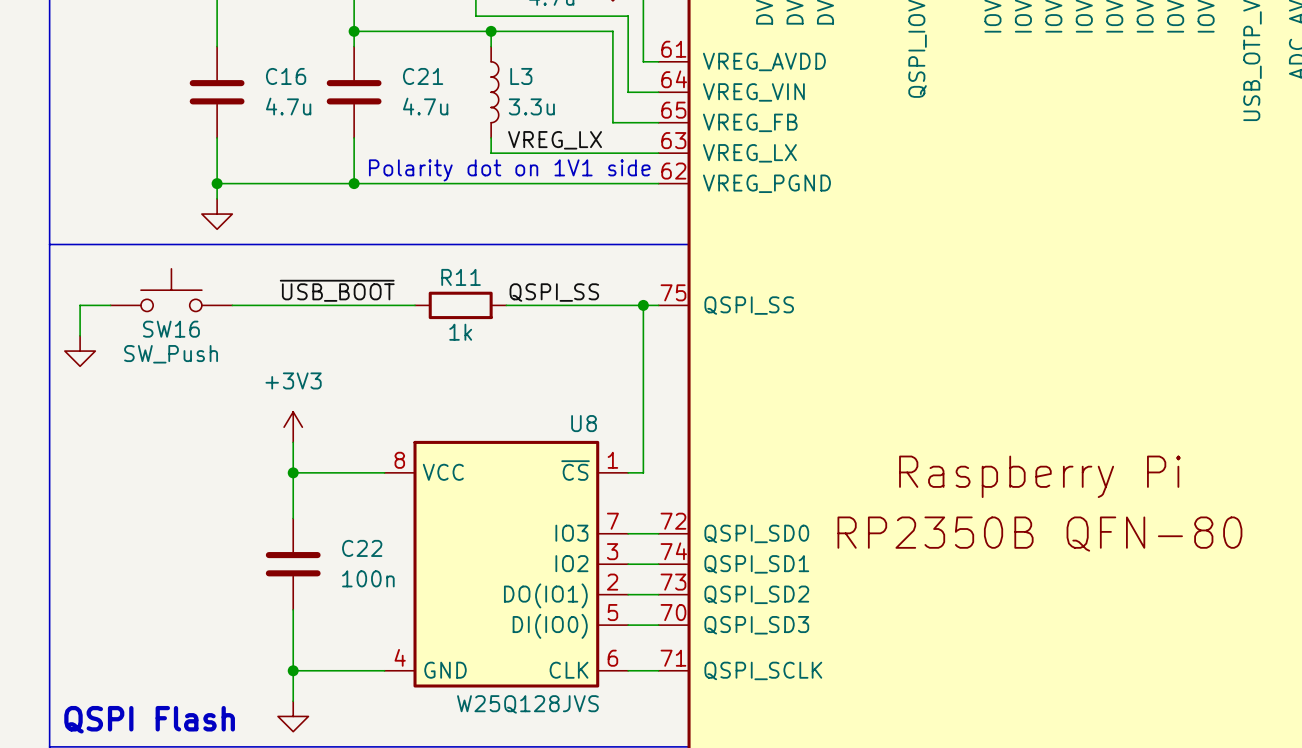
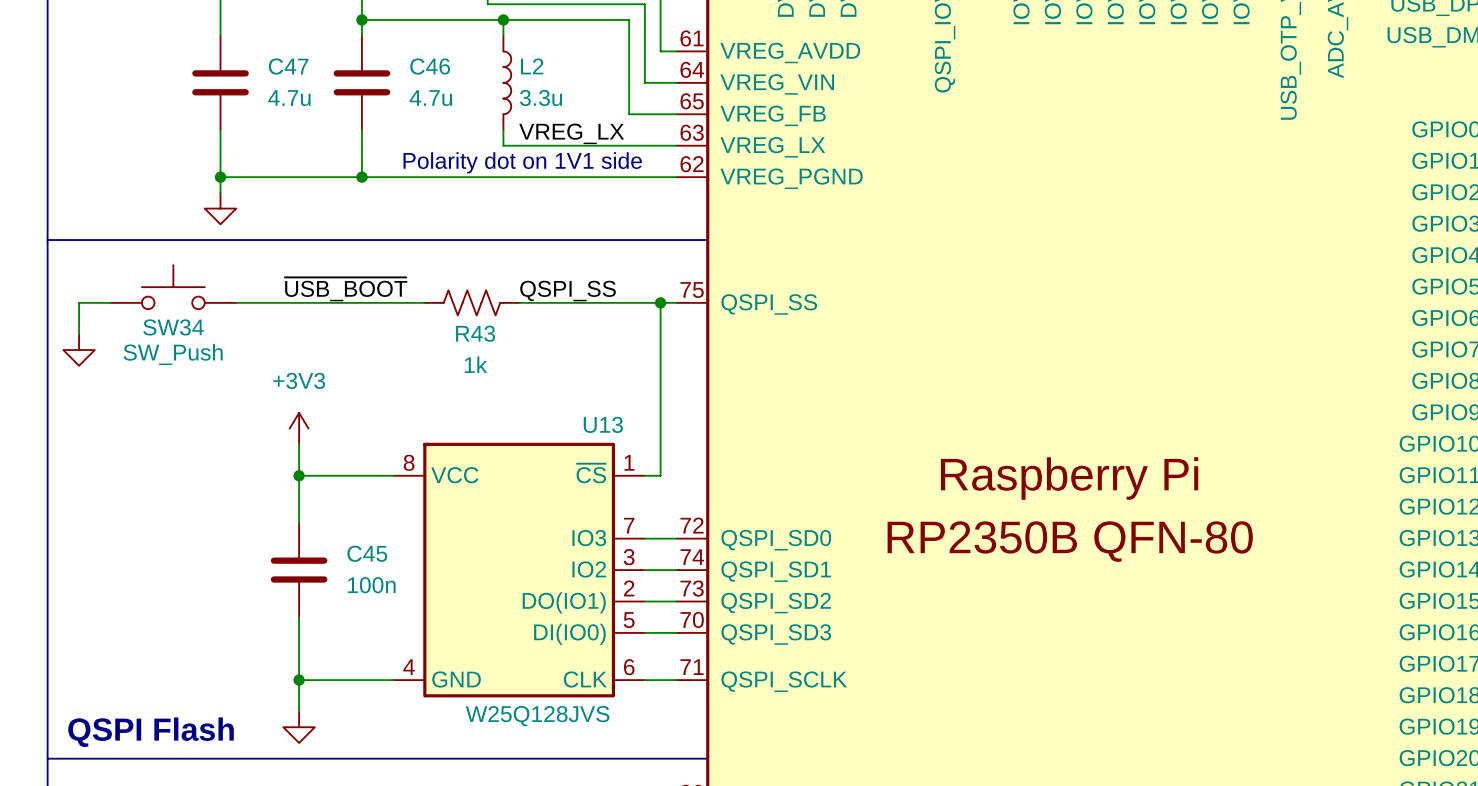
C16 name: C16 (286, 76) -> C47 (288, 66)
C21 name: C21 (423, 76) -> C46 (430, 66)
L3 name: L3 (521, 76) -> L2 (532, 66)
R11: 1k (460, 305) -> none
R43: none -> 1k (471, 302)
SW16 name: SW16 (171, 329) -> SW34 (173, 327)
U8 name: U8 (584, 423) -> U13 (603, 424)
C22 name: C22 (362, 548) -> C45 (367, 553)

